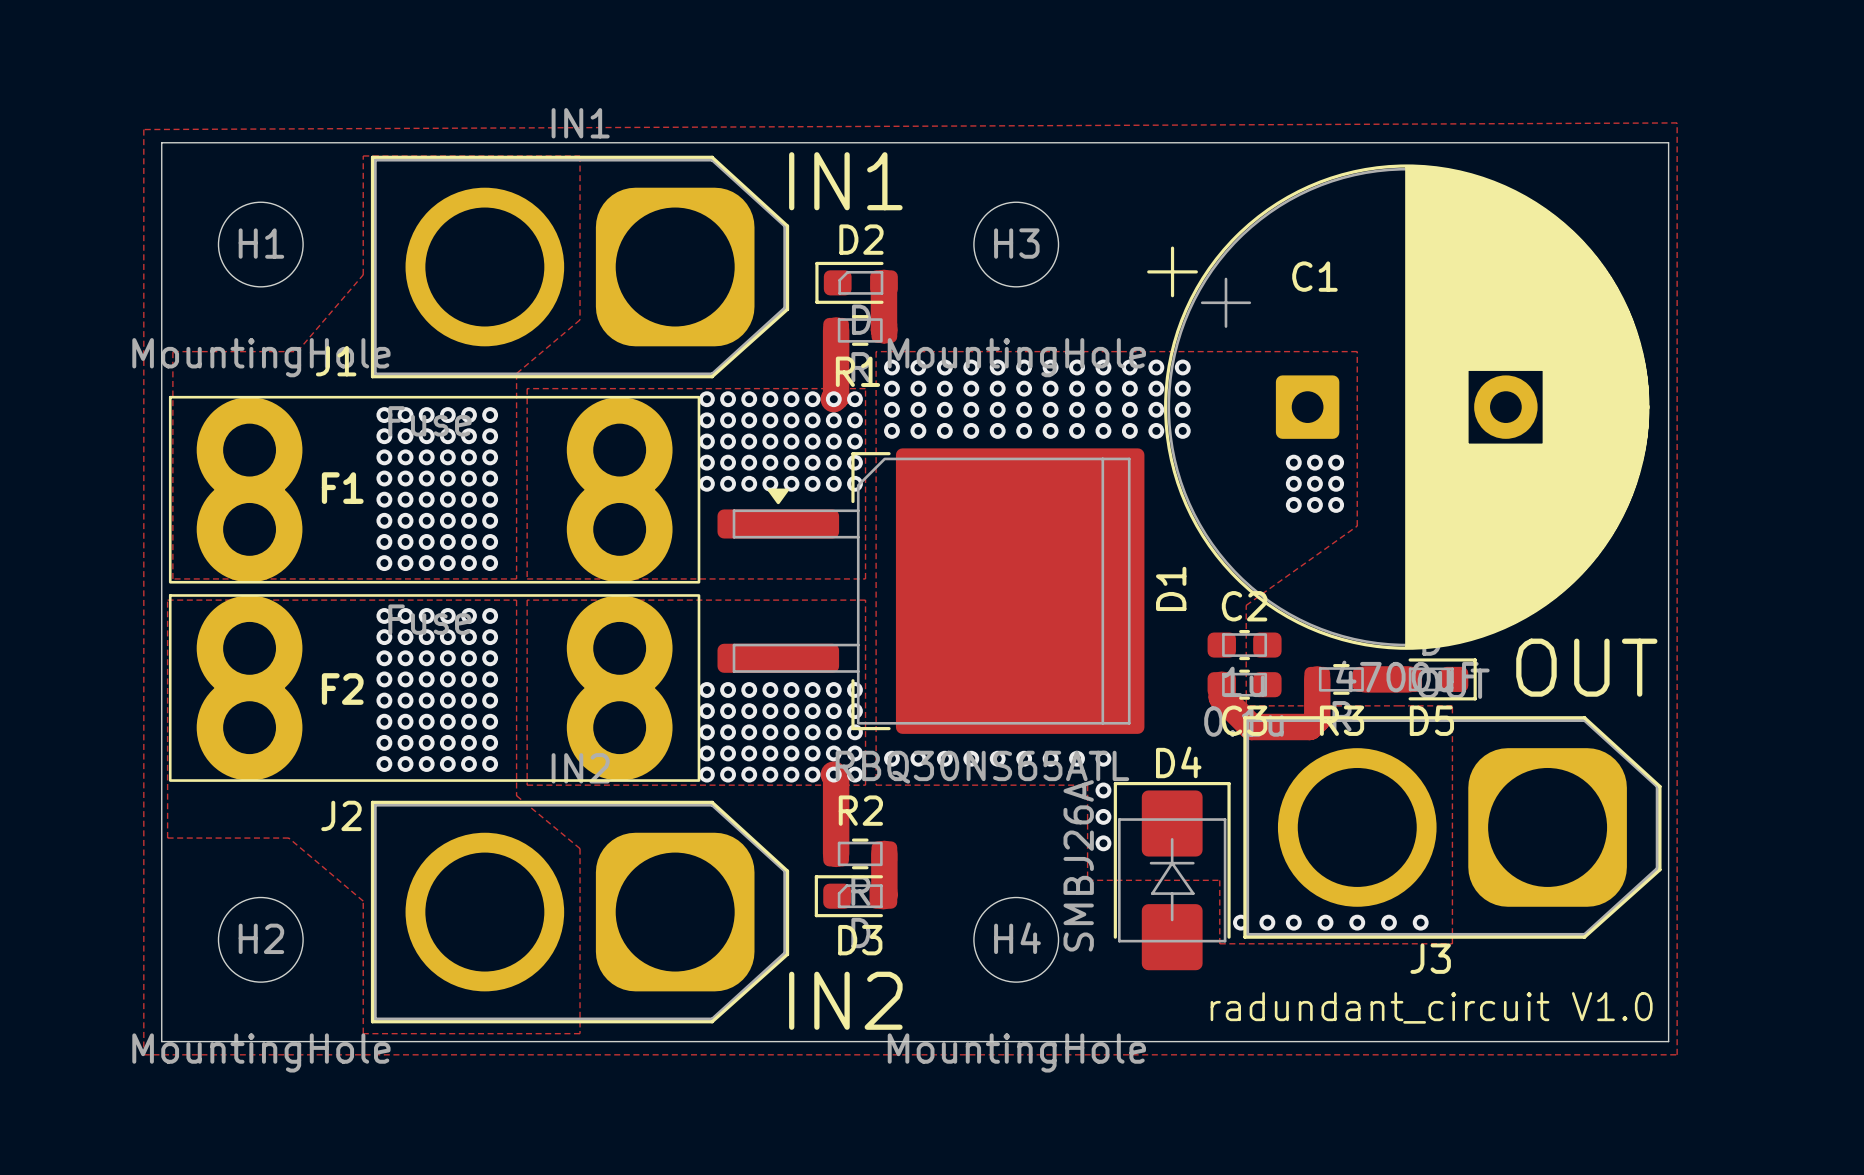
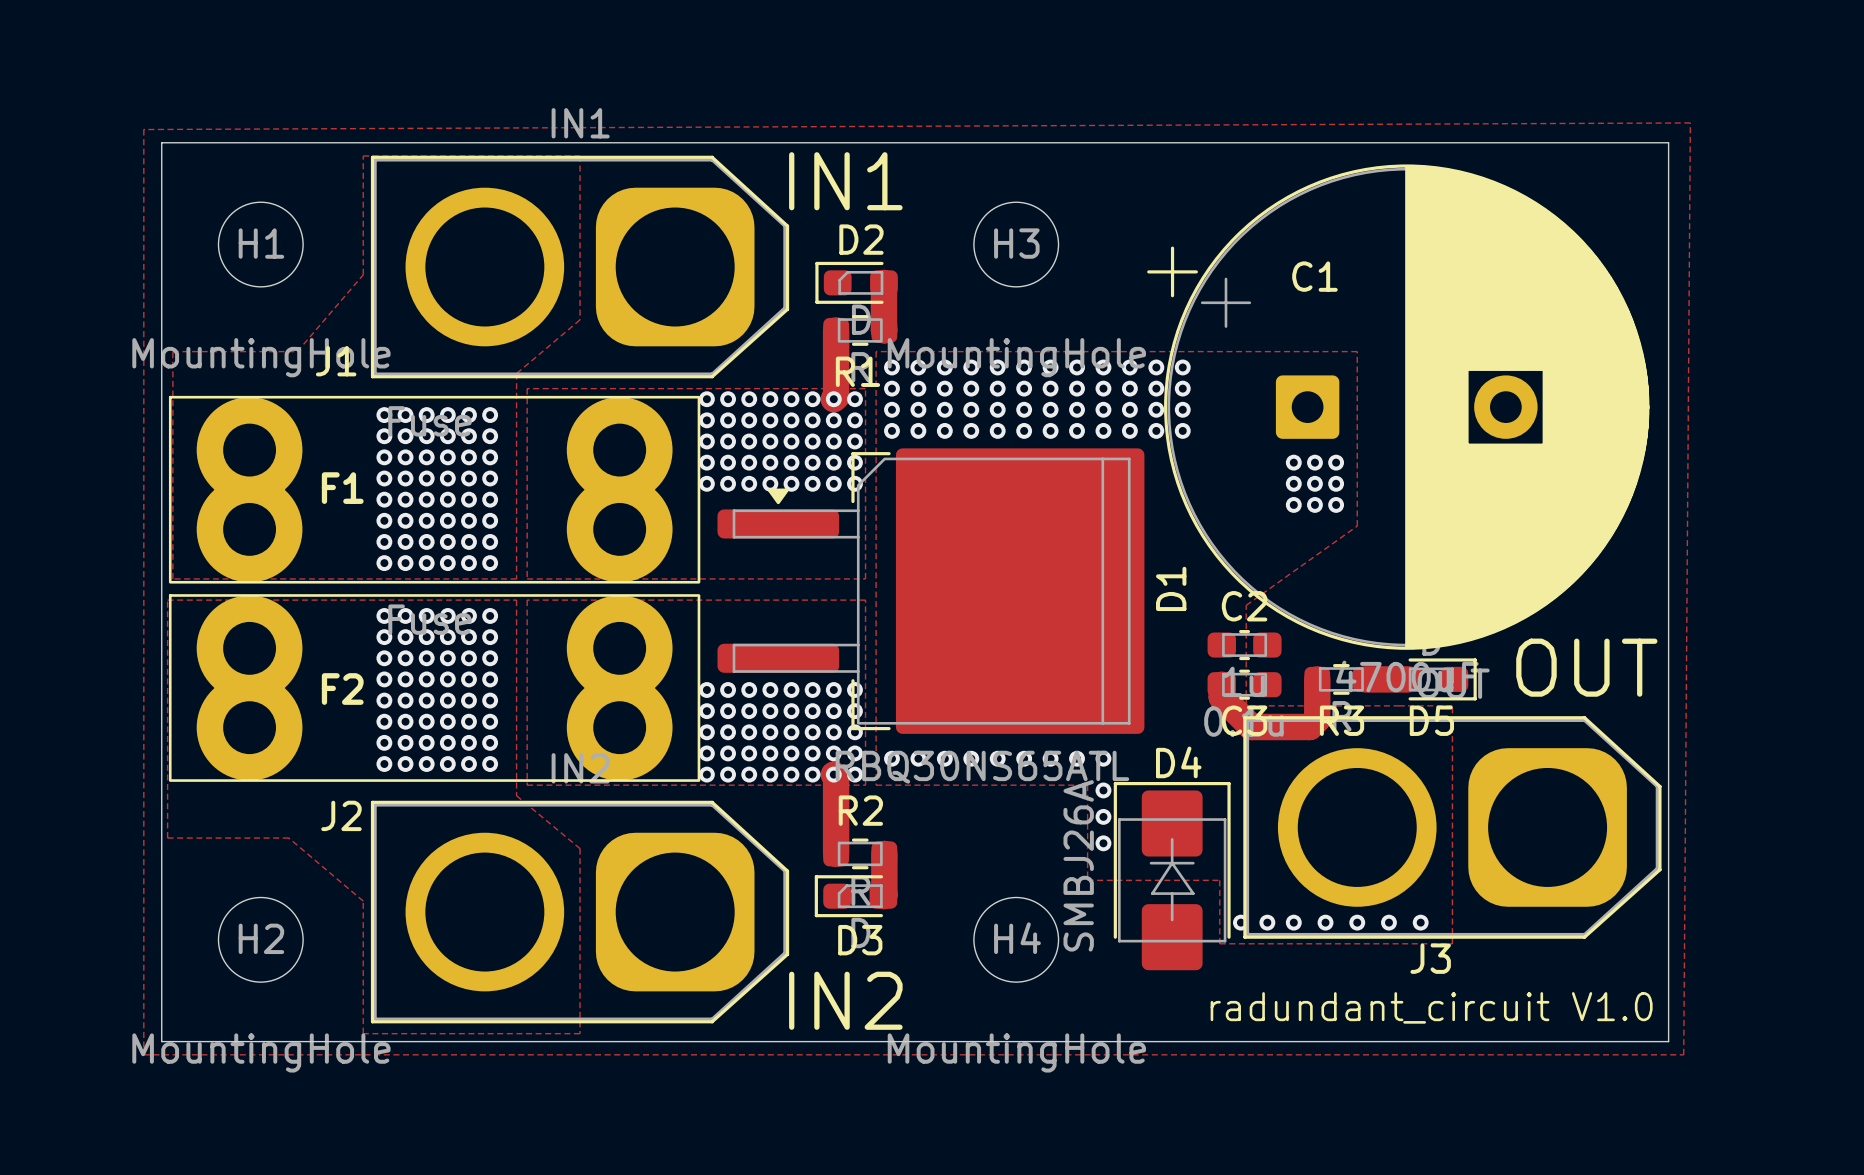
zone outline: (143, 129) (1677, 122) (1677, 1054) -> (143, 129) (1690, 122) (1683, 1054) (1677, 1054)

